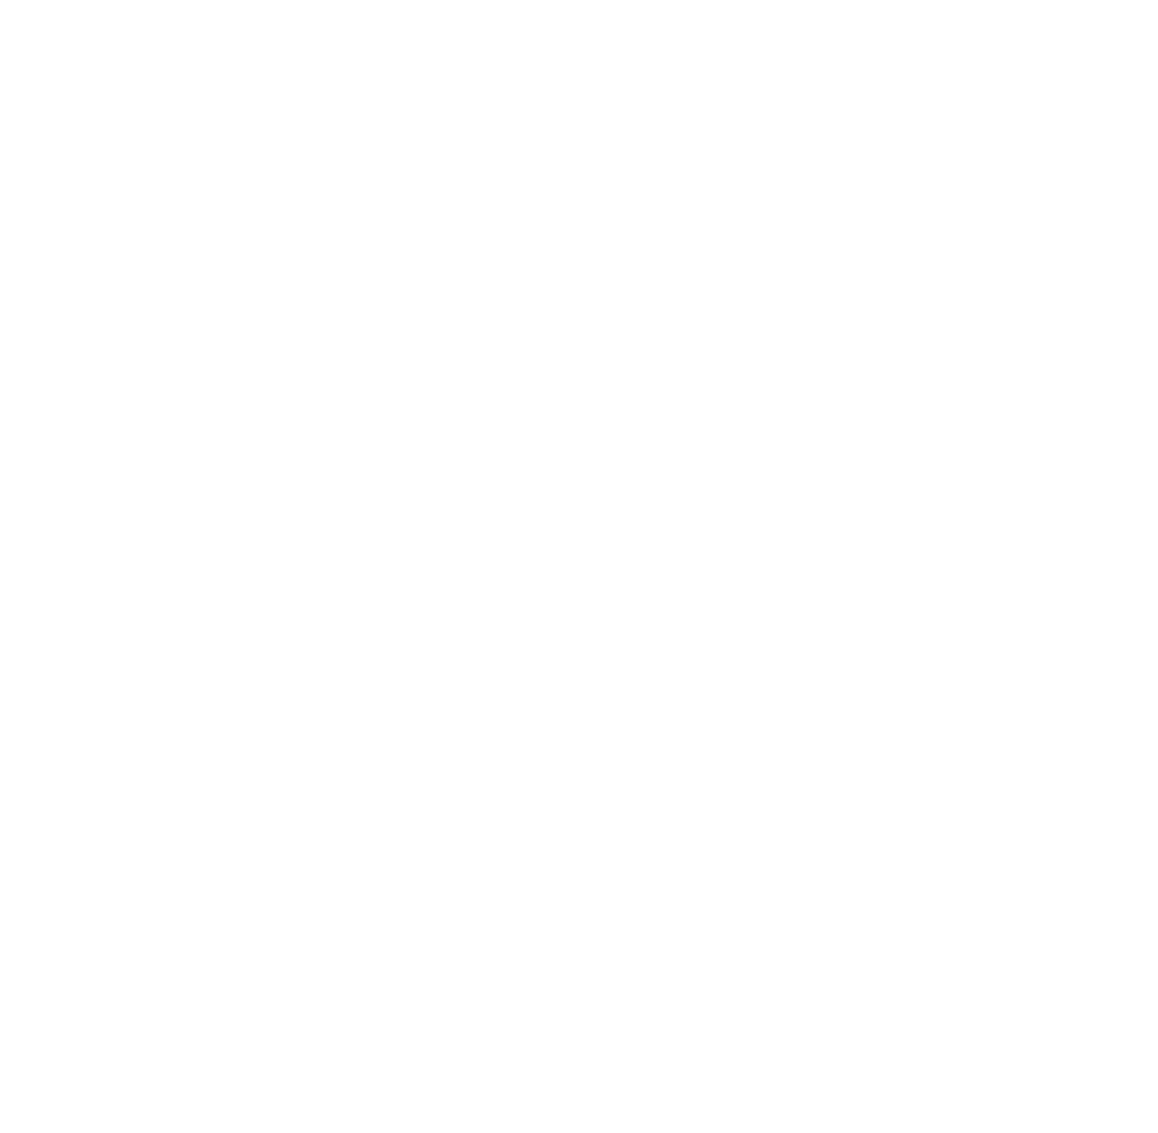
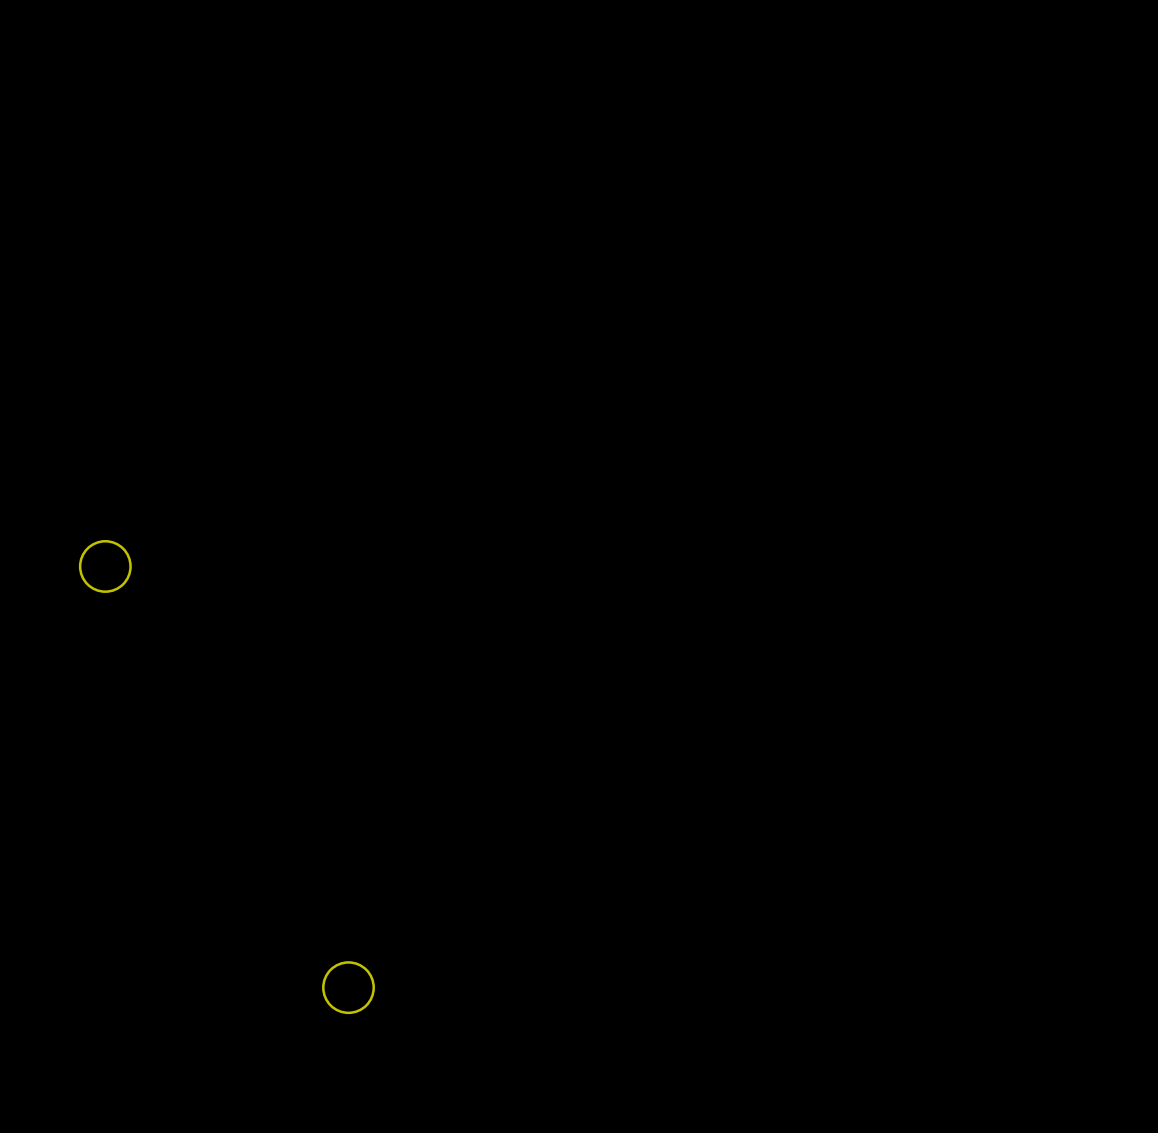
round board edge: none -> [78, 540, 132, 593]
round board edge: none -> [322, 961, 375, 1015]

